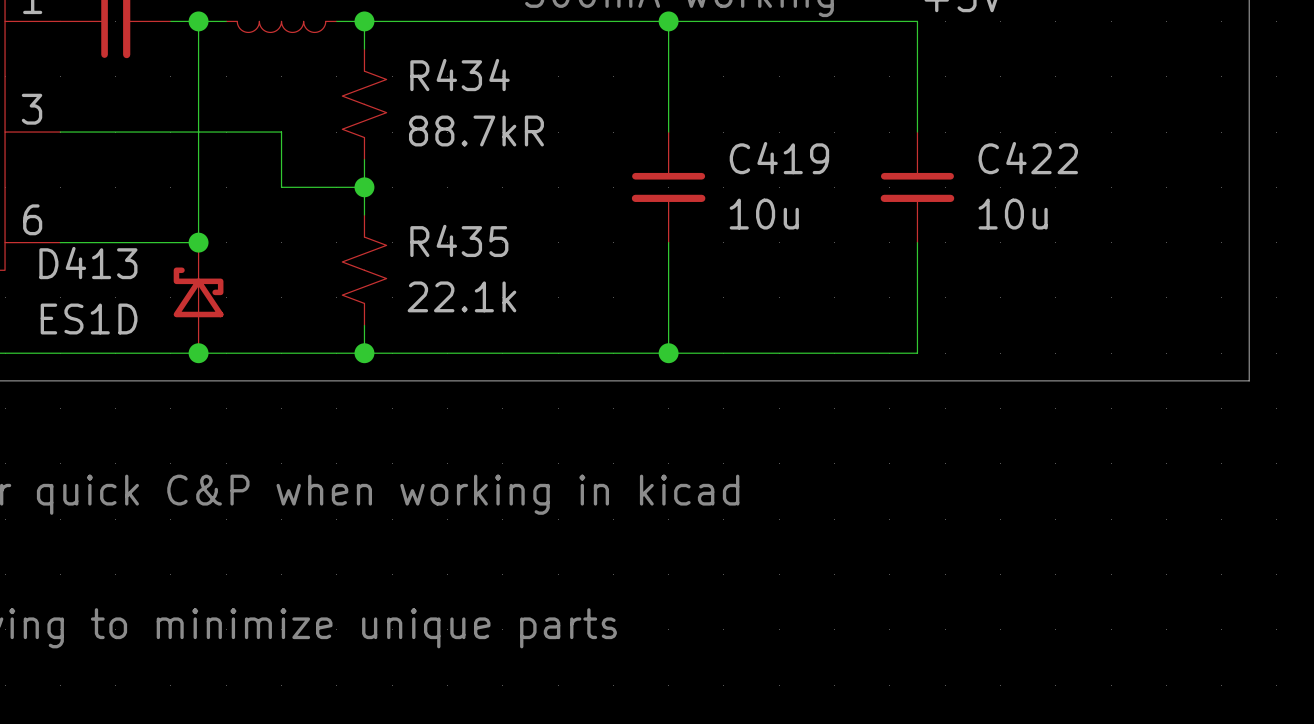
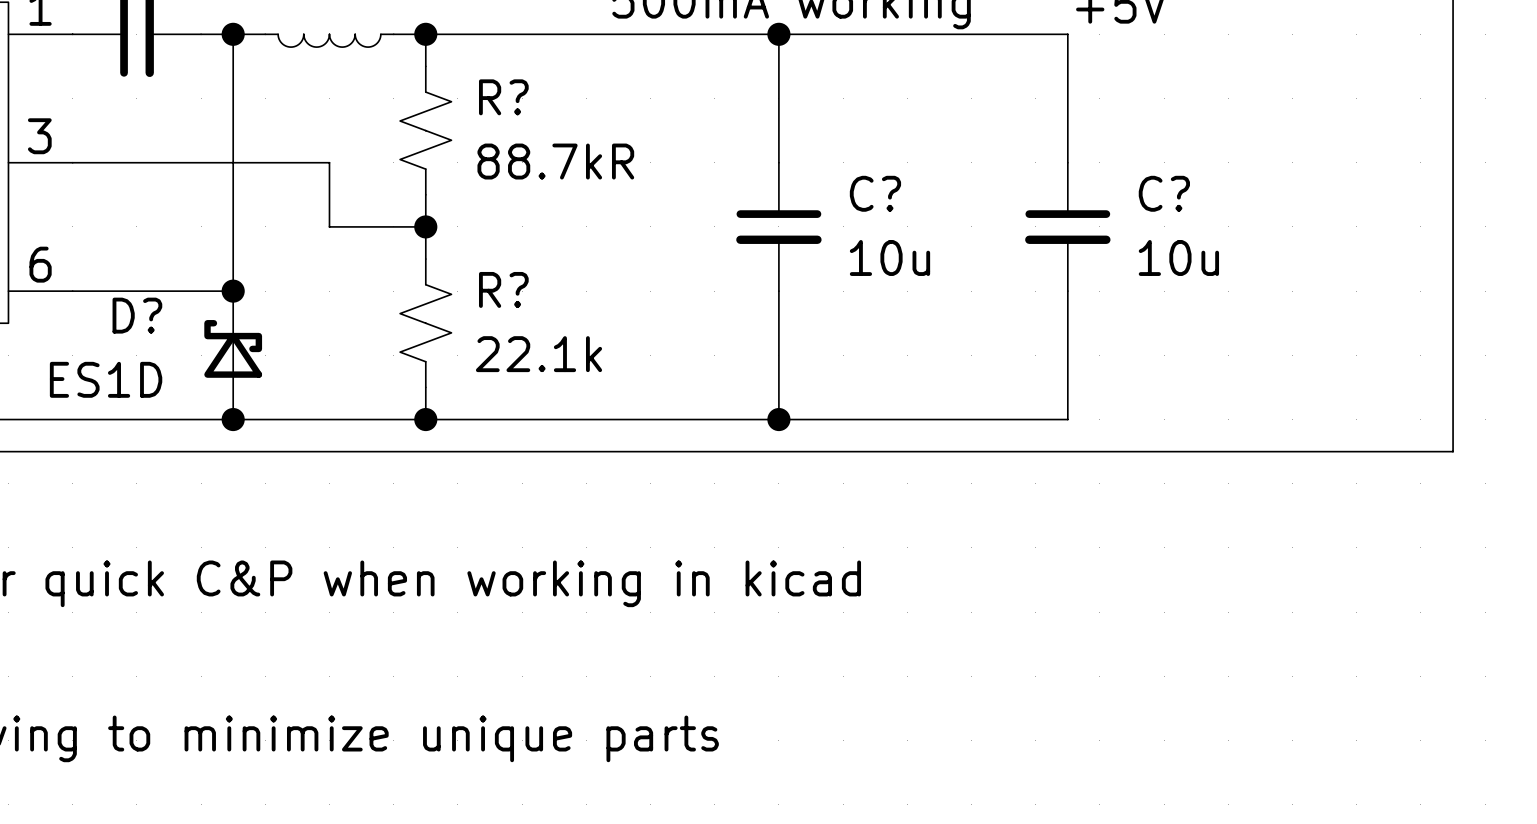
R434 name: R434 (460, 75) -> R? (503, 97)
C419 name: C419 (779, 158) -> C? (875, 193)
C422 name: C422 (1028, 158) -> C? (1164, 193)
R435 name: R435 (459, 240) -> R? (503, 289)
D413 name: D413 (88, 263) -> D? (137, 315)

